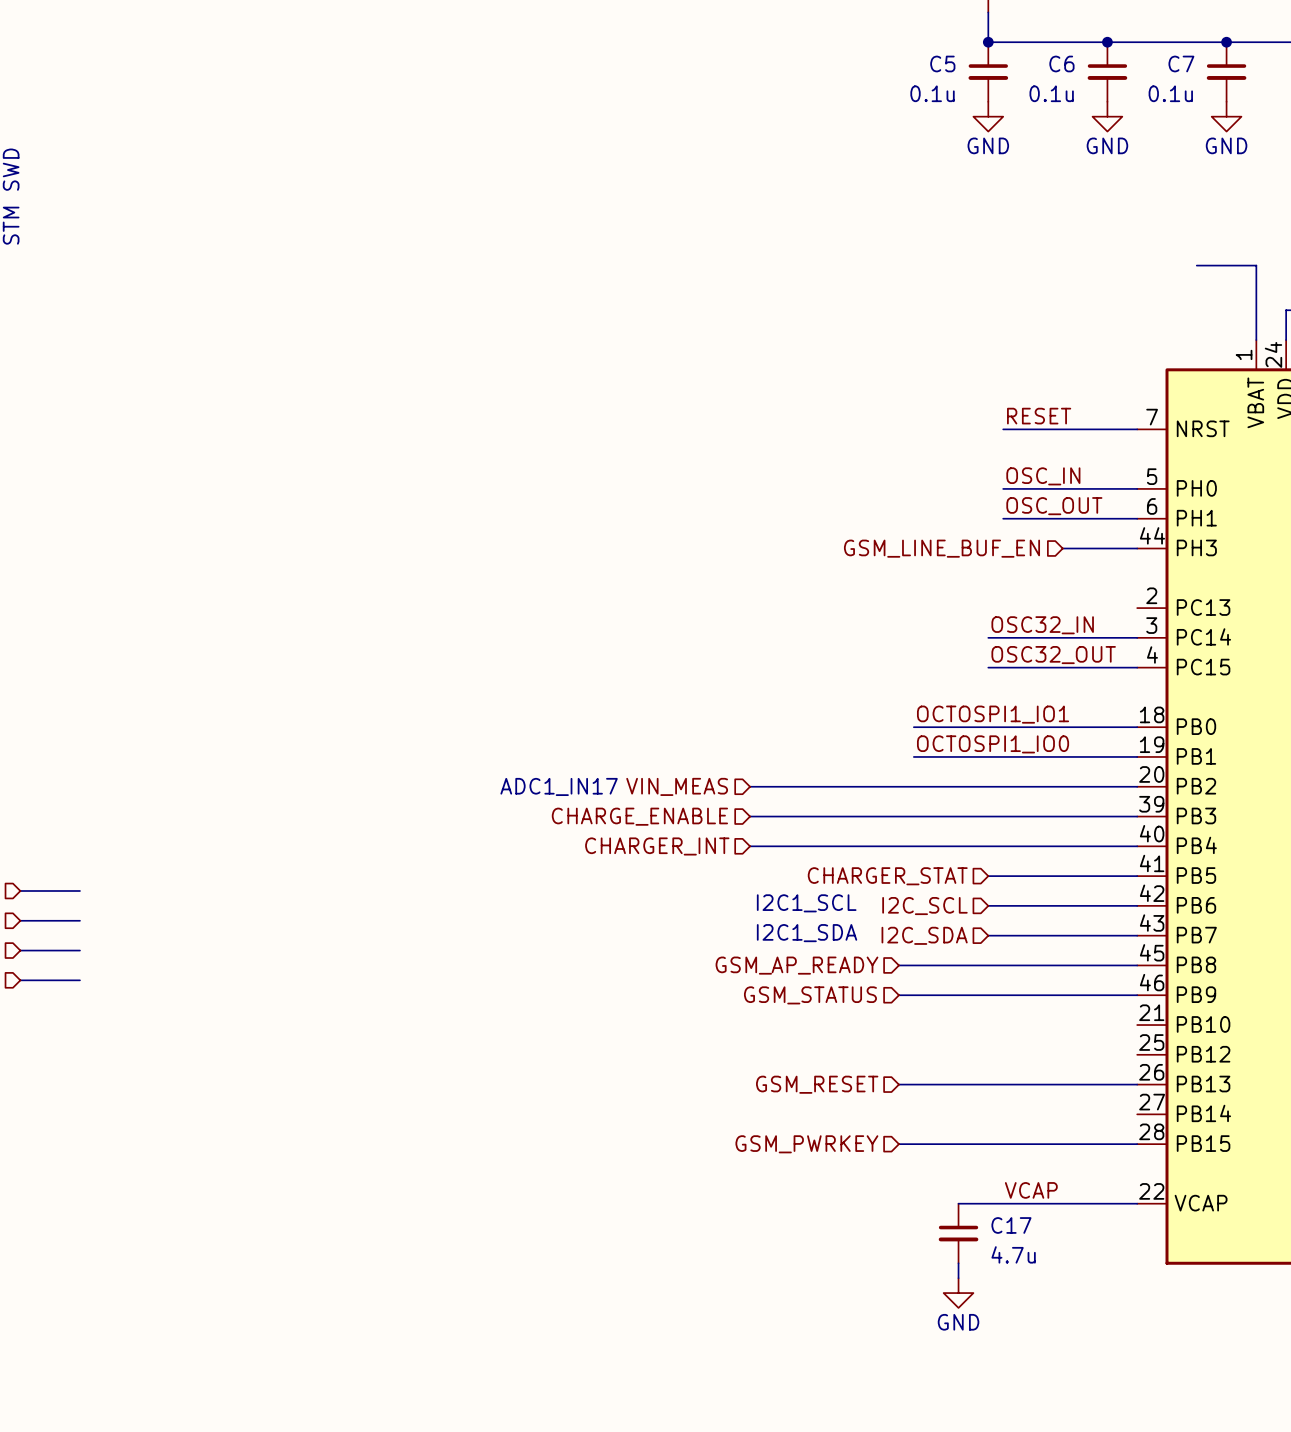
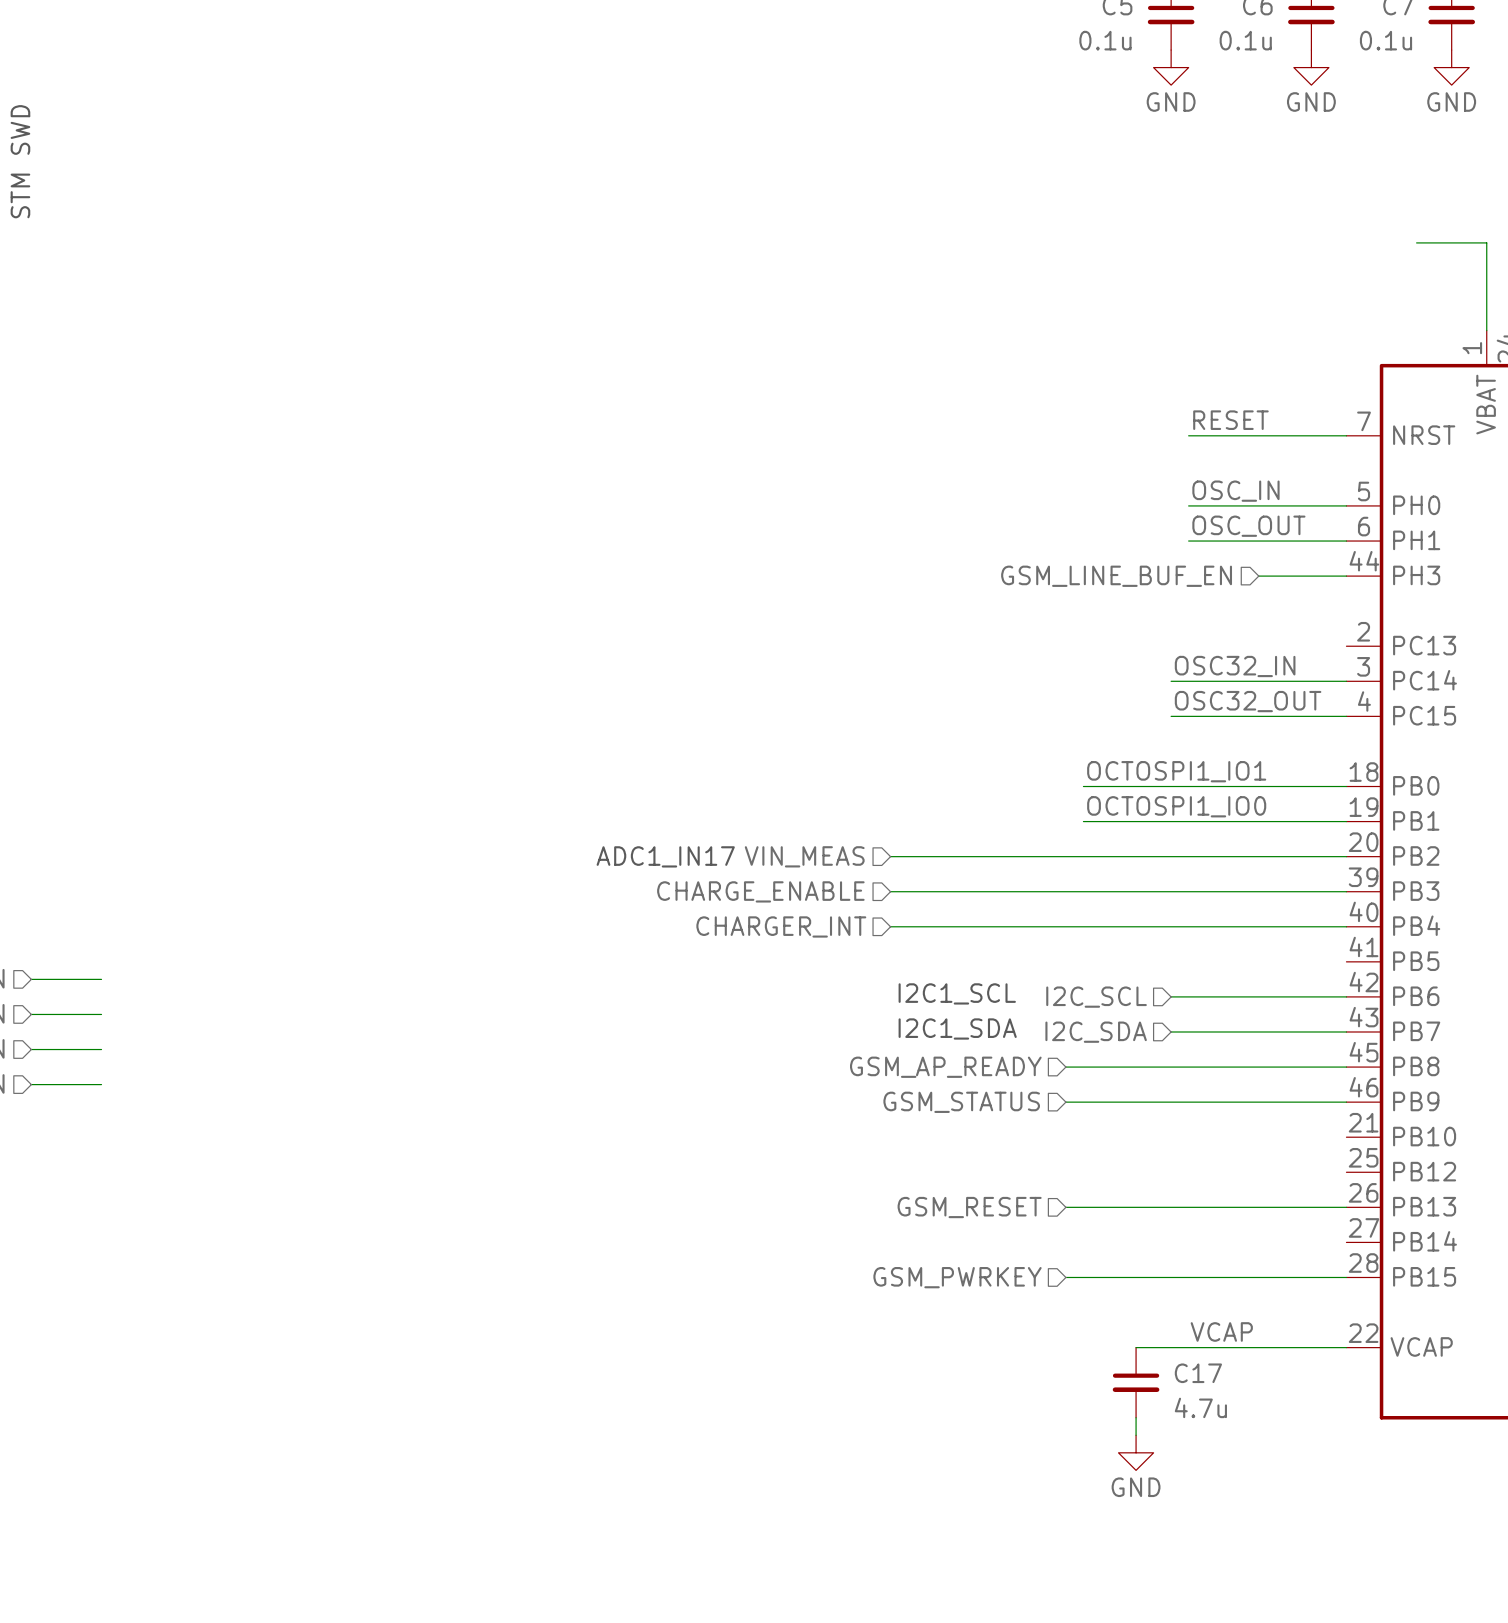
hierarchical label: CHARGER_STAT (887, 876) -> none
wire: (988, 876) (1137, 876) -> none

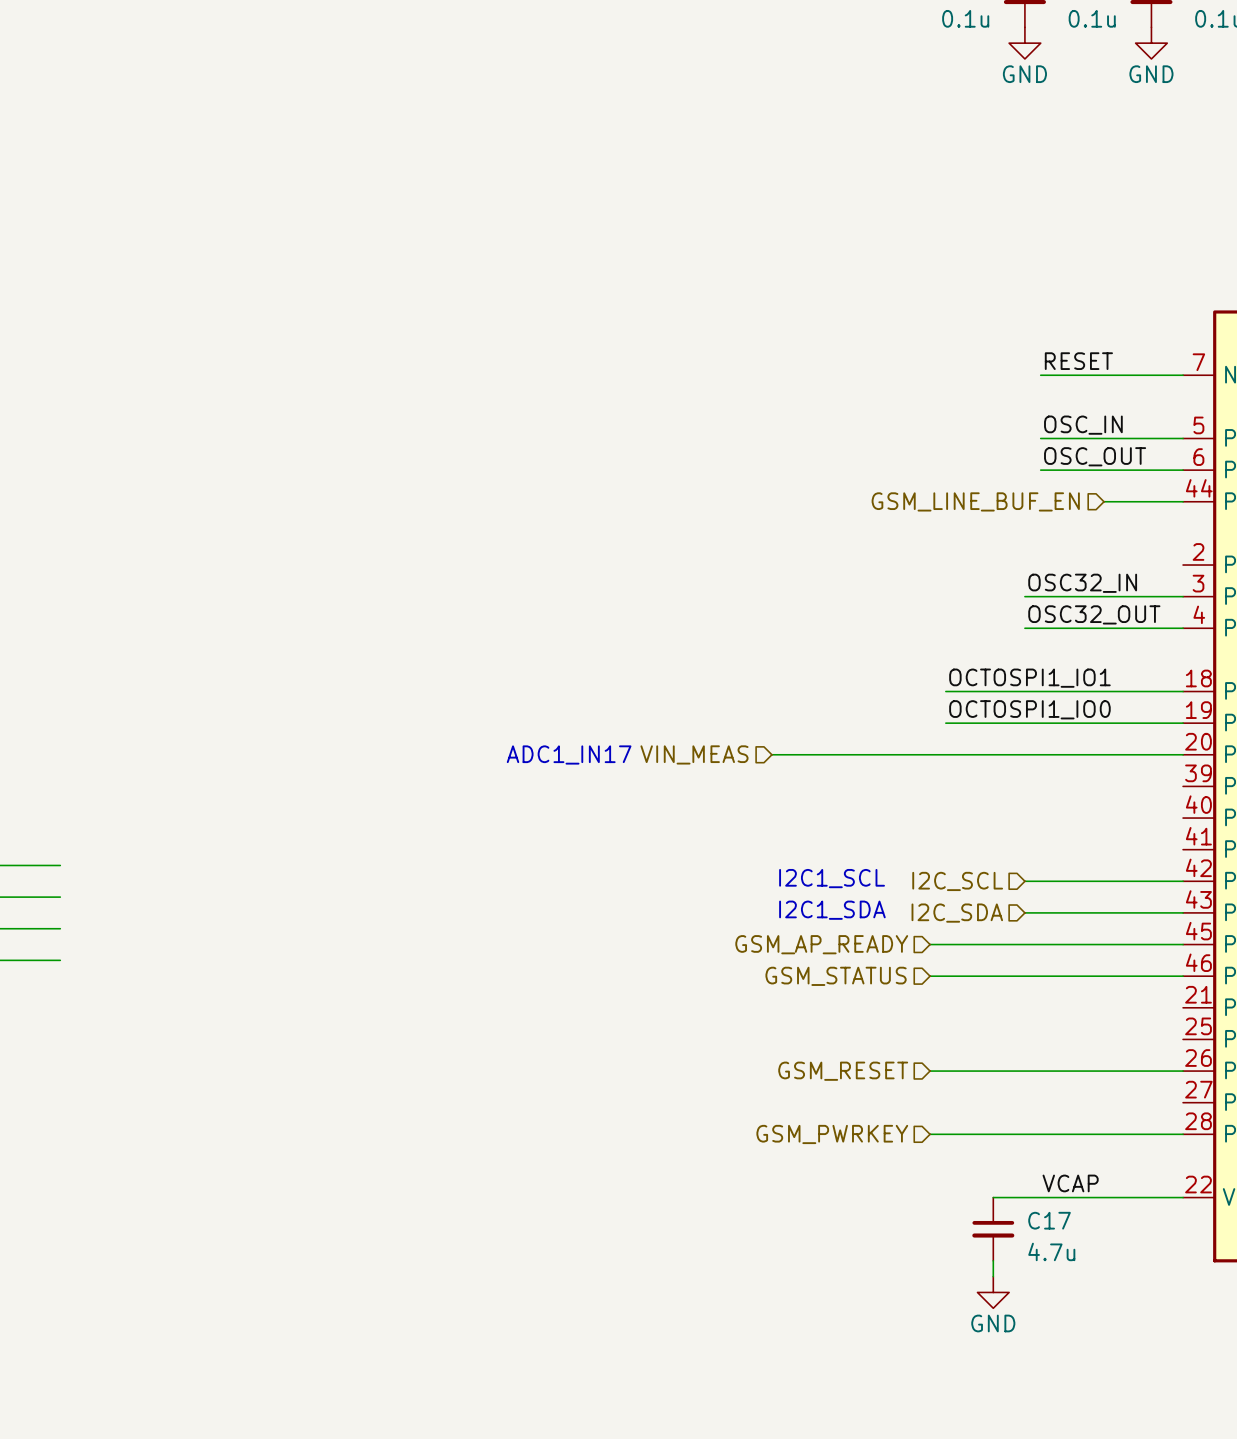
hierarchical label: CHARGE_ENABLE (760, 891) -> none
wire: (890, 891) (1346, 891) -> none
hierarchical label: CHARGER_INT (781, 926) -> none
wire: (890, 926) (1346, 926) -> none

